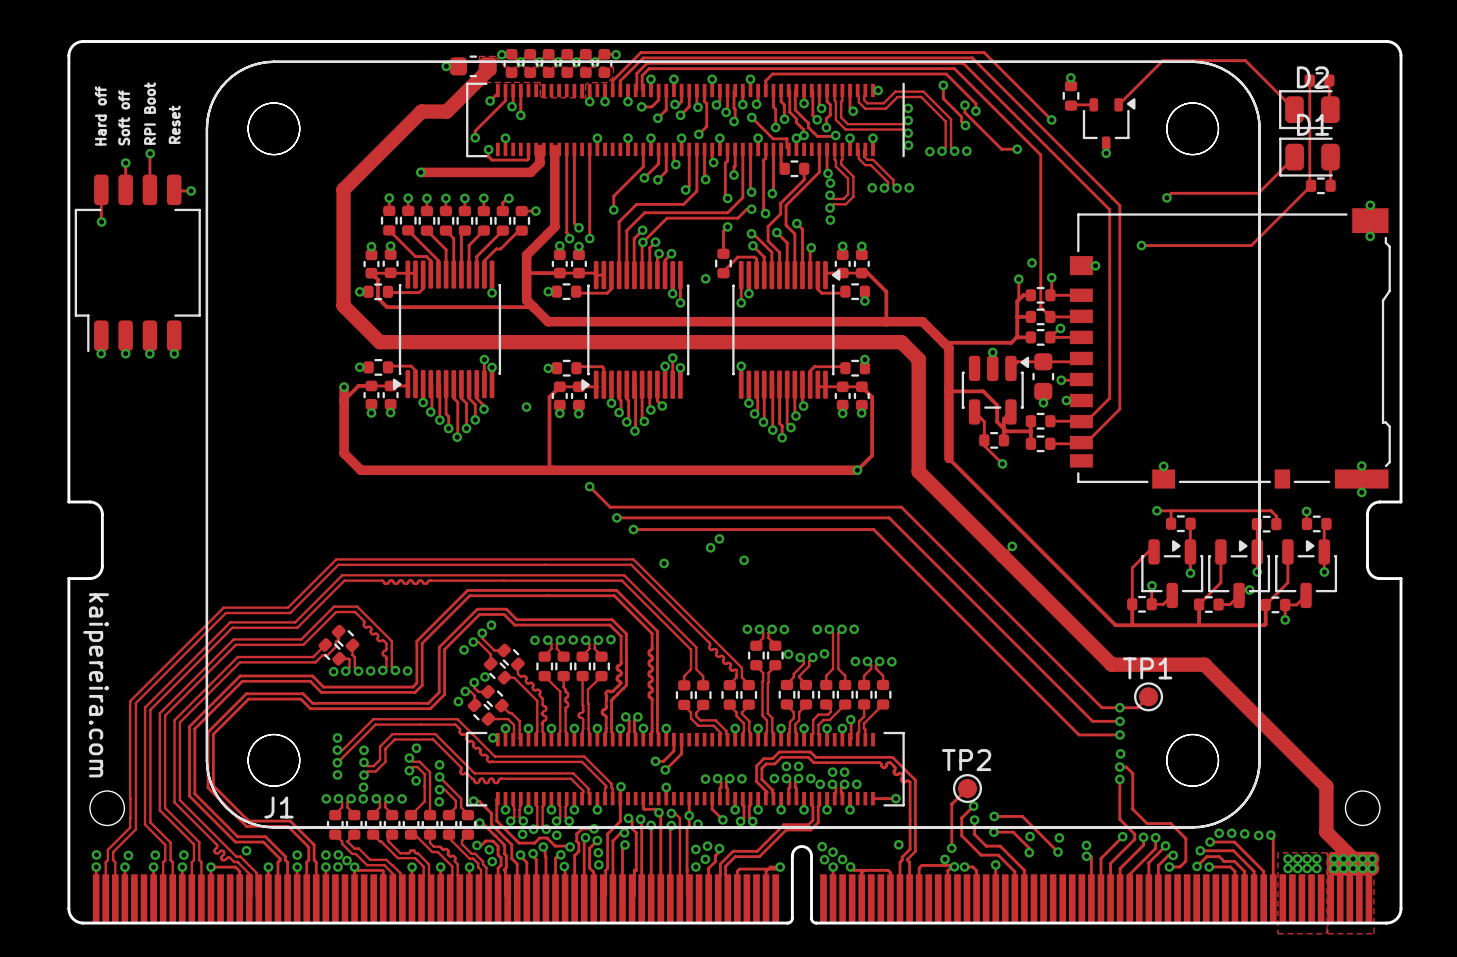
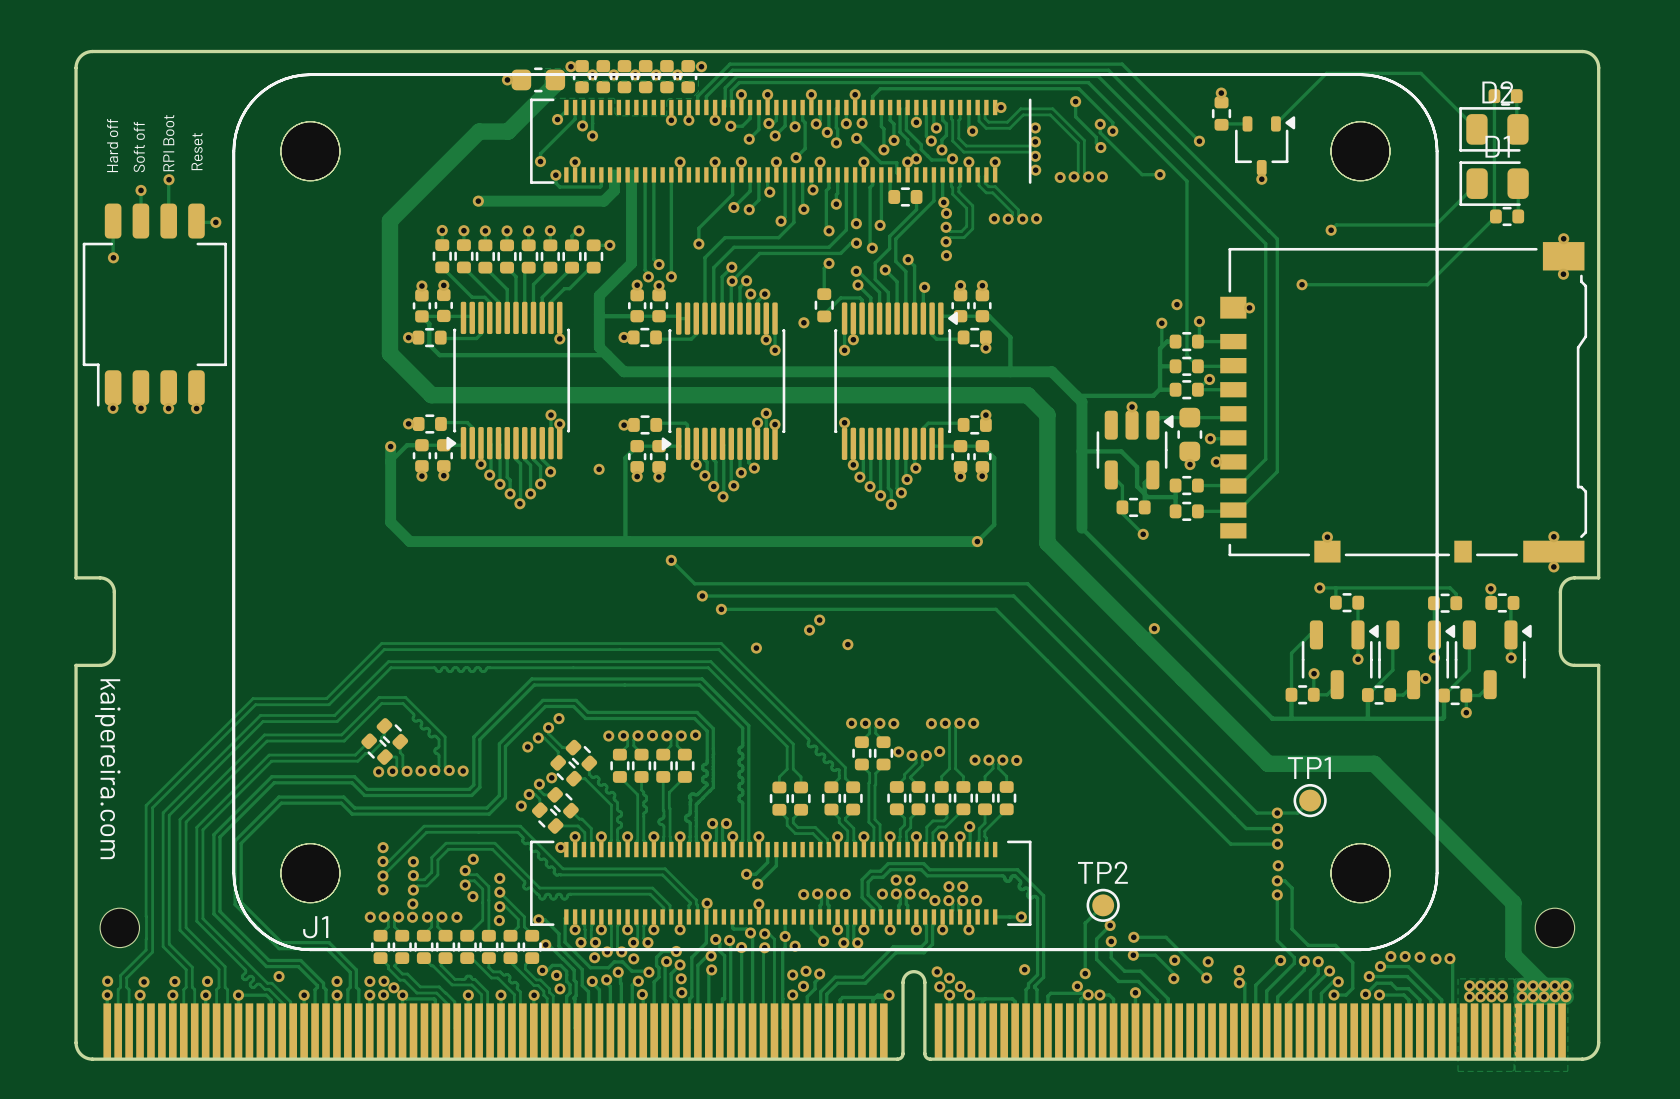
part footprint: [961, 355, 1030, 425] -> [1096, 410, 1174, 490]
part footprint: [1141, 539, 1204, 609] -> [1301, 620, 1379, 700]
part footprint: [1208, 539, 1271, 609] -> [1378, 620, 1456, 700]
part footprint: [1275, 539, 1338, 609] -> [1454, 620, 1532, 700]

